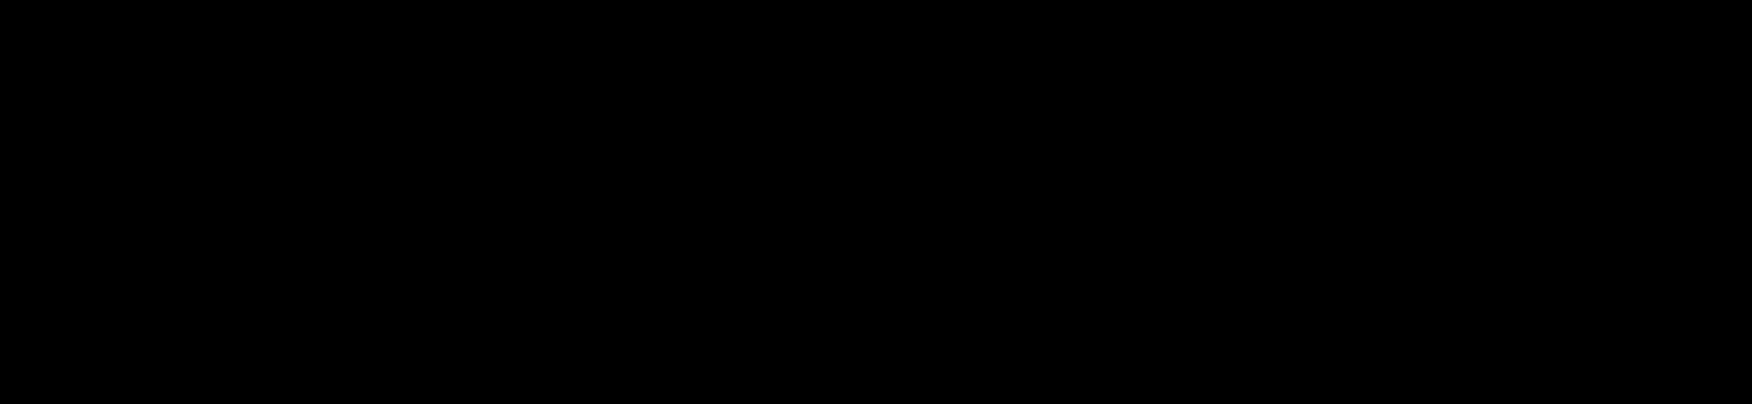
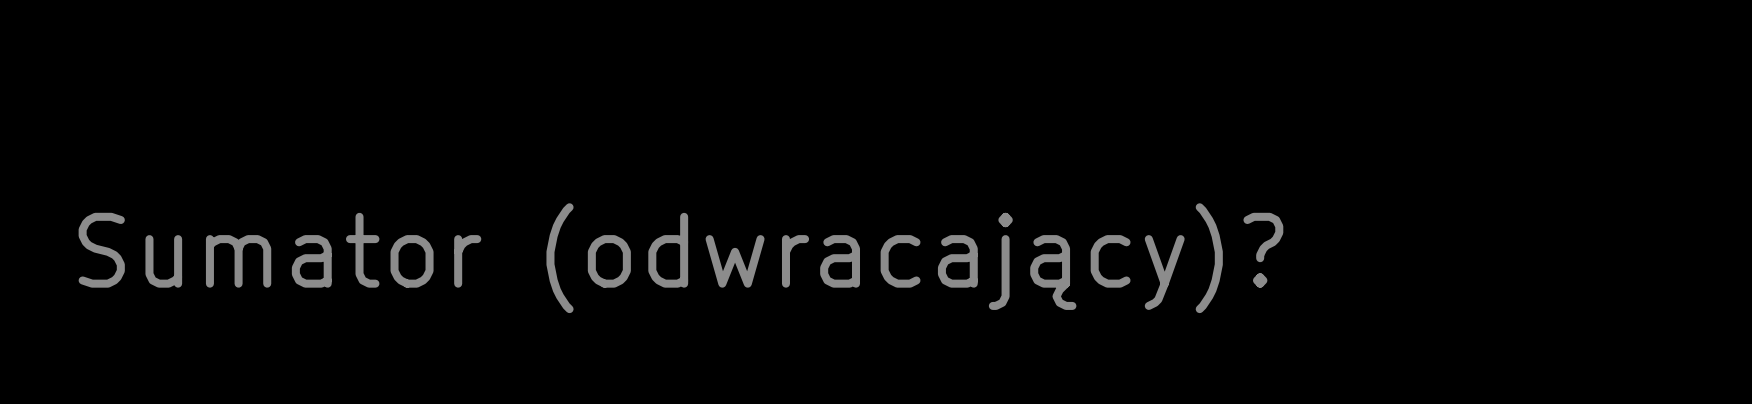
text: none -> Sumator (odwracający)? (680, 258)

